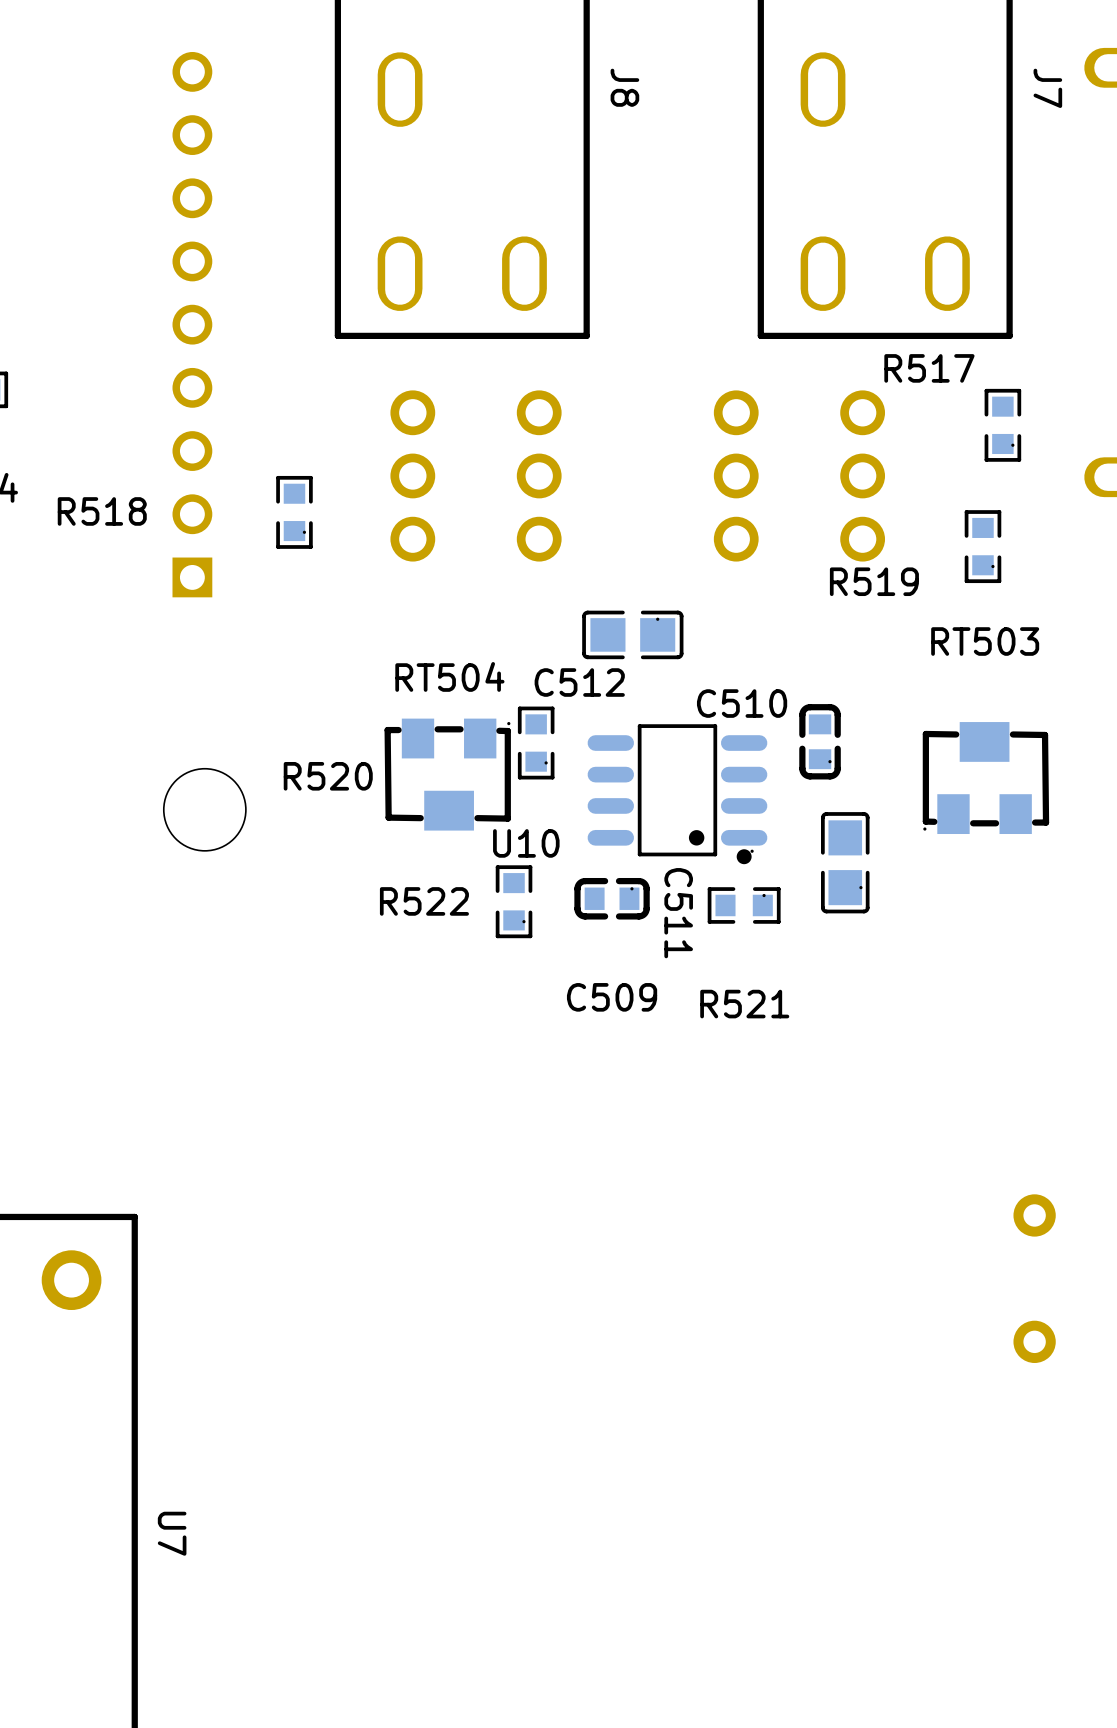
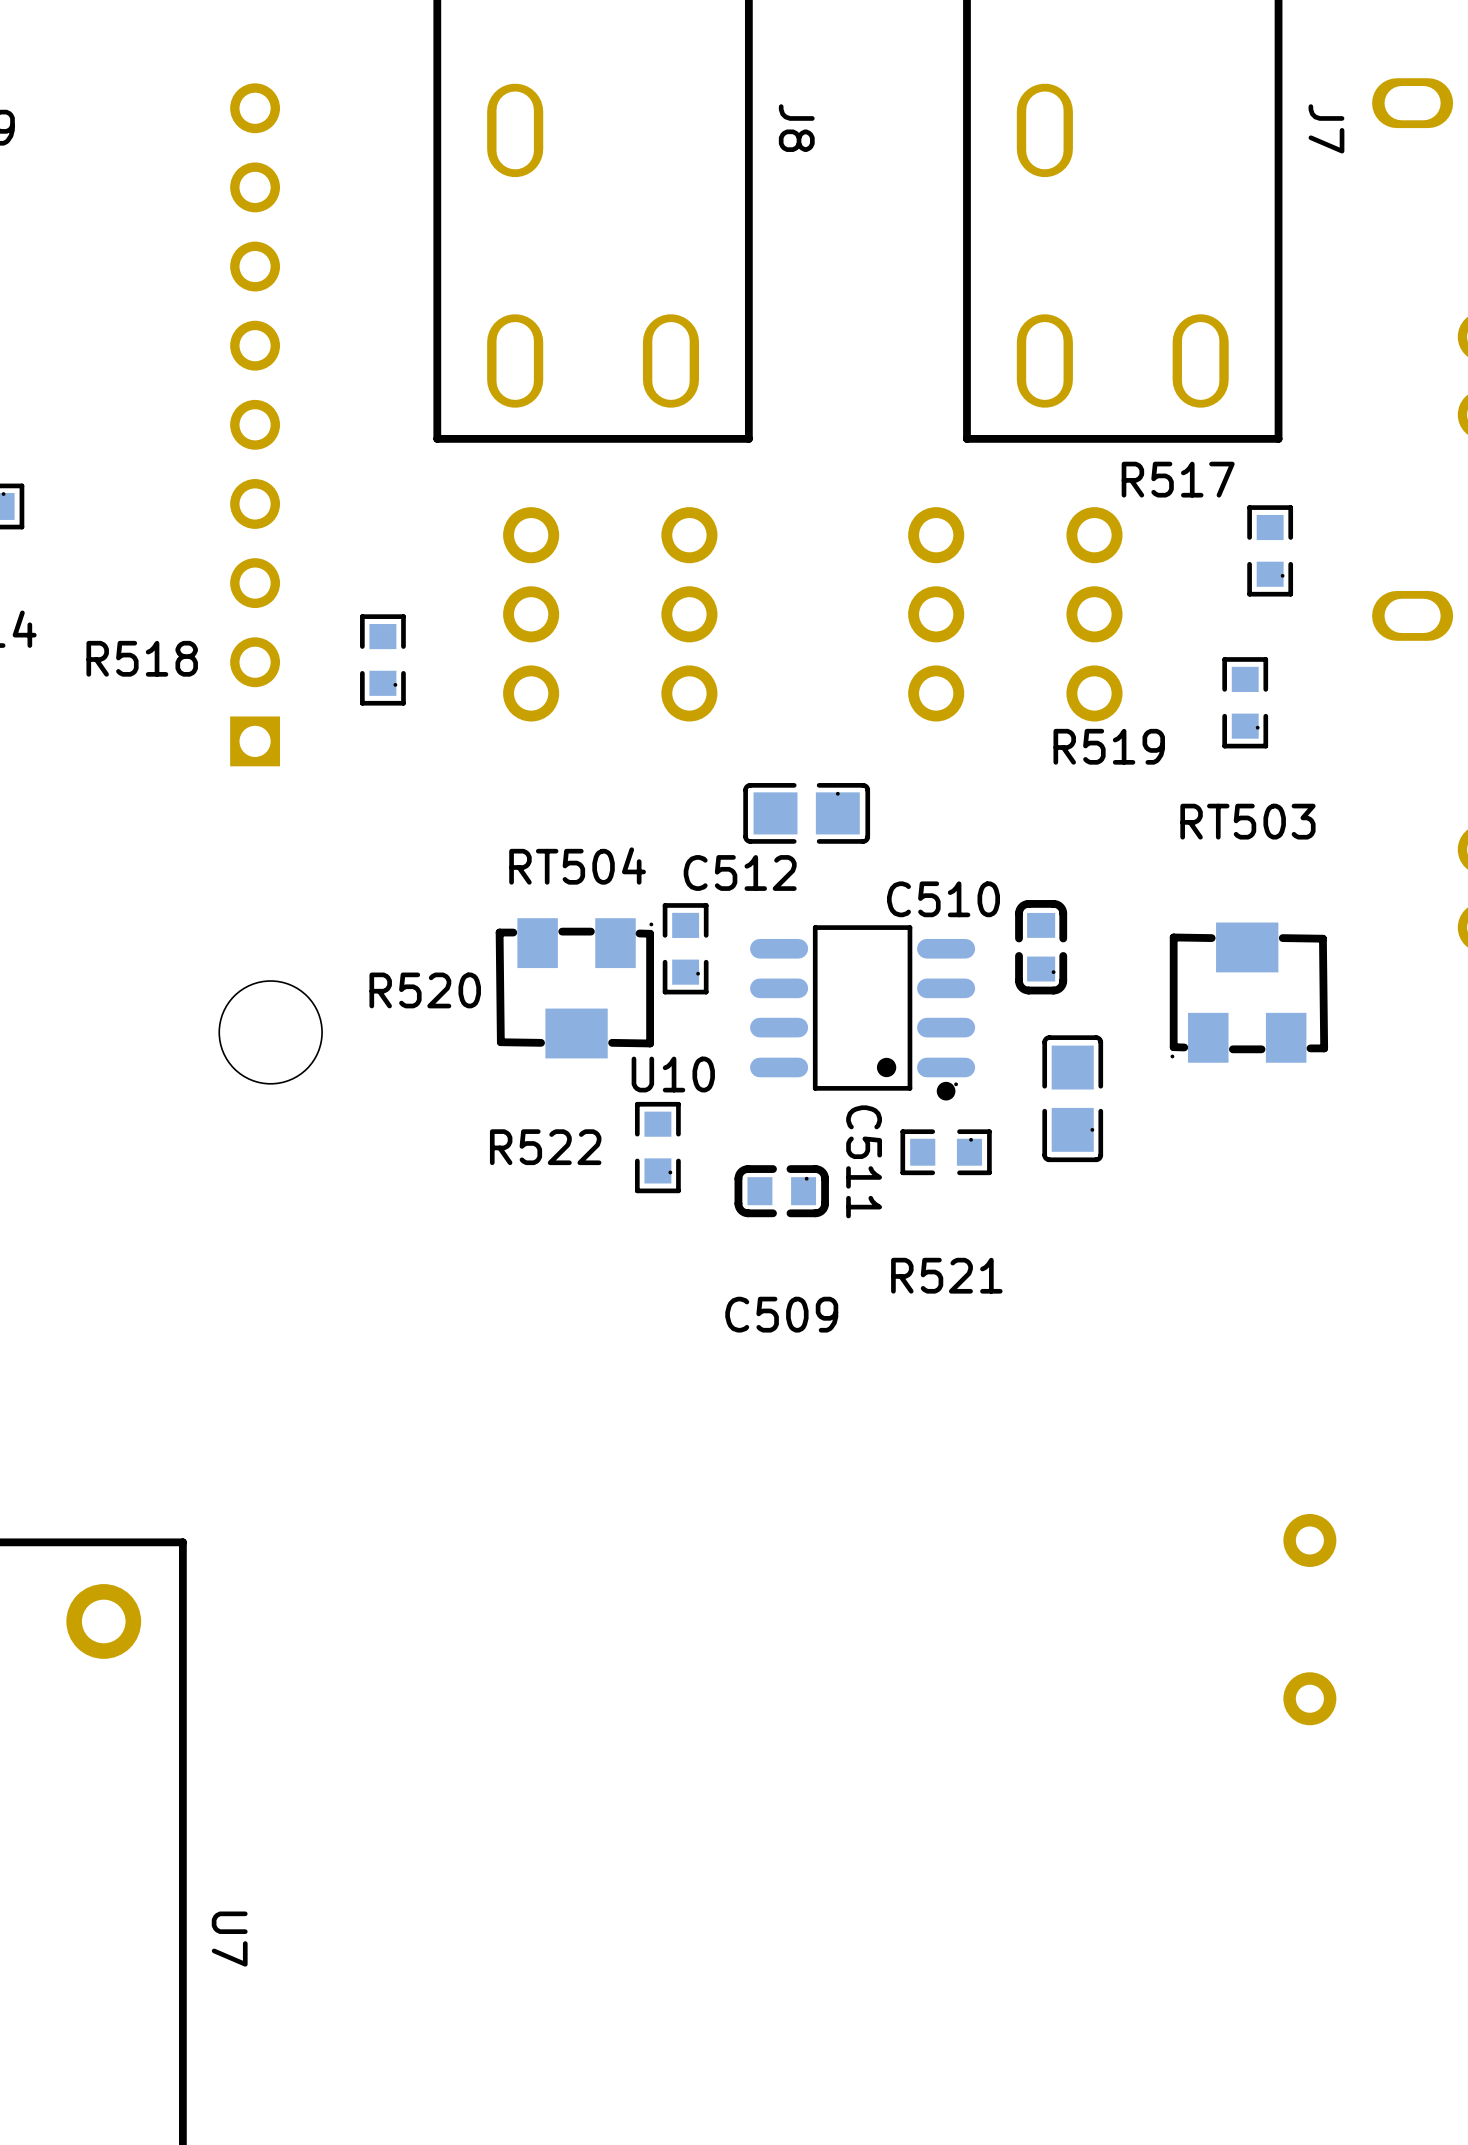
C509 position: (612, 898) -> (781, 1191)

